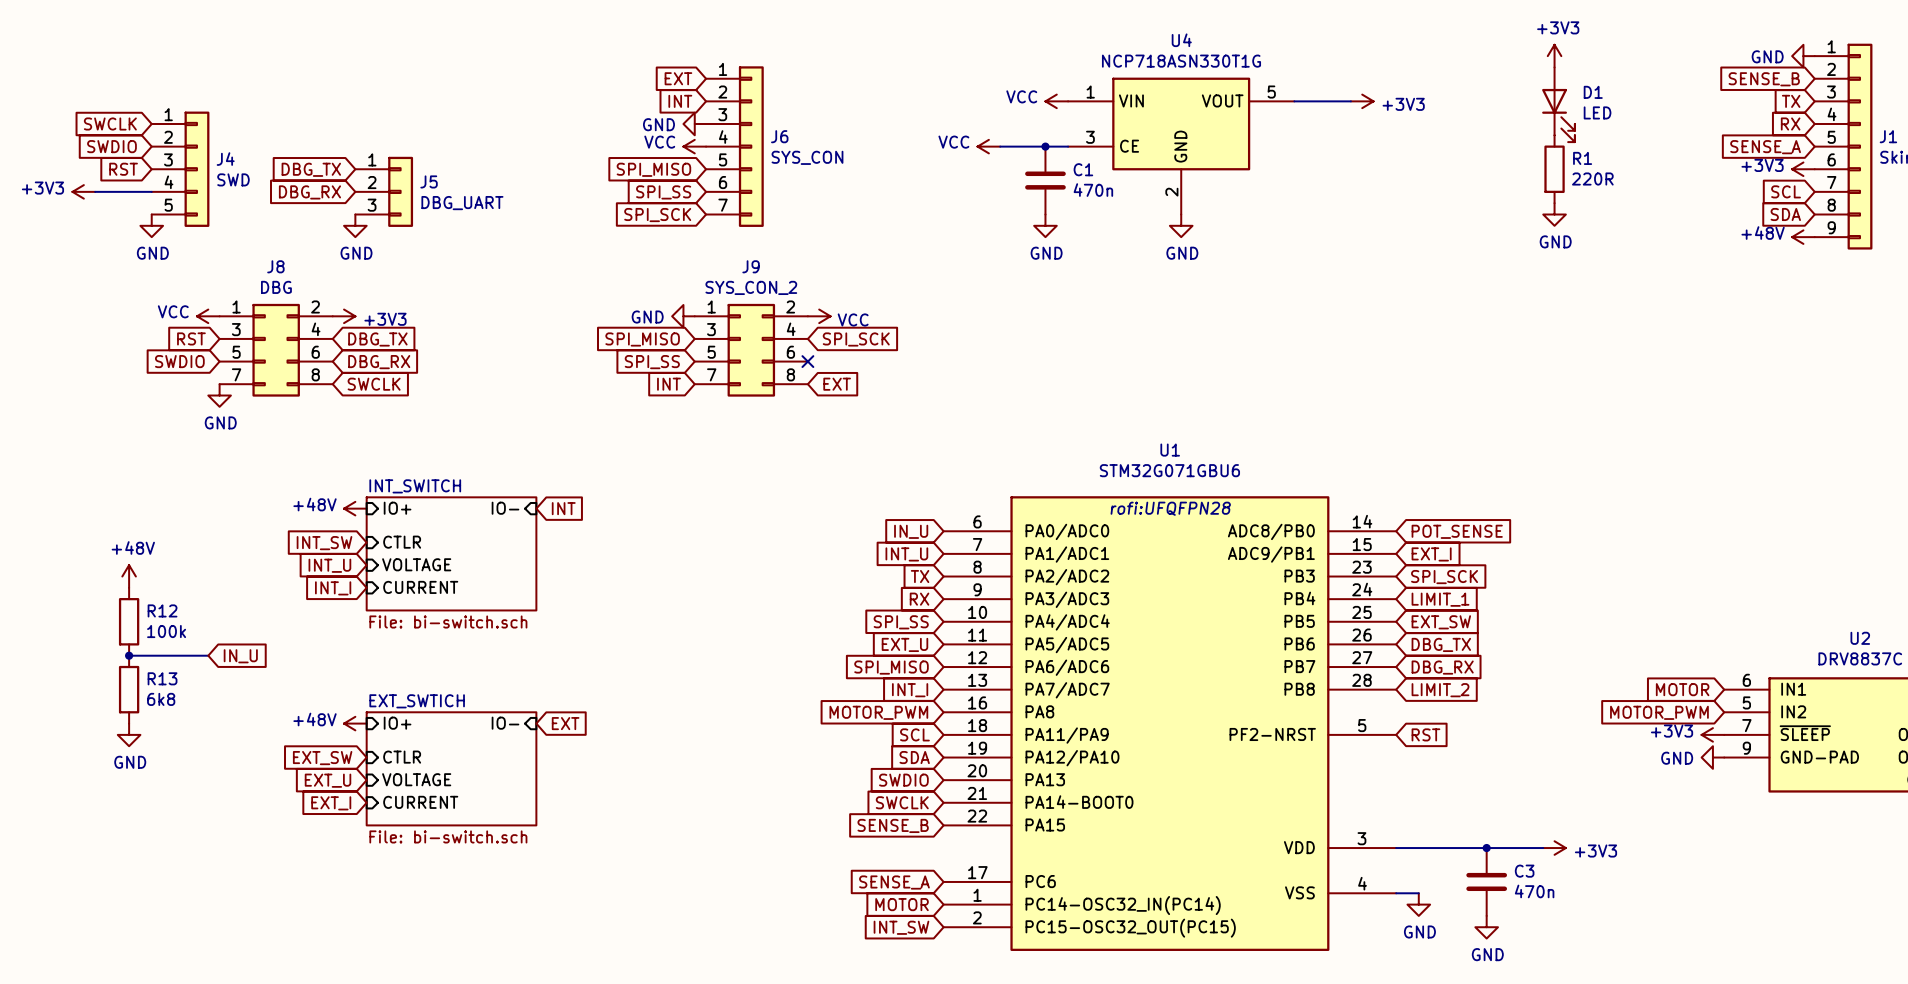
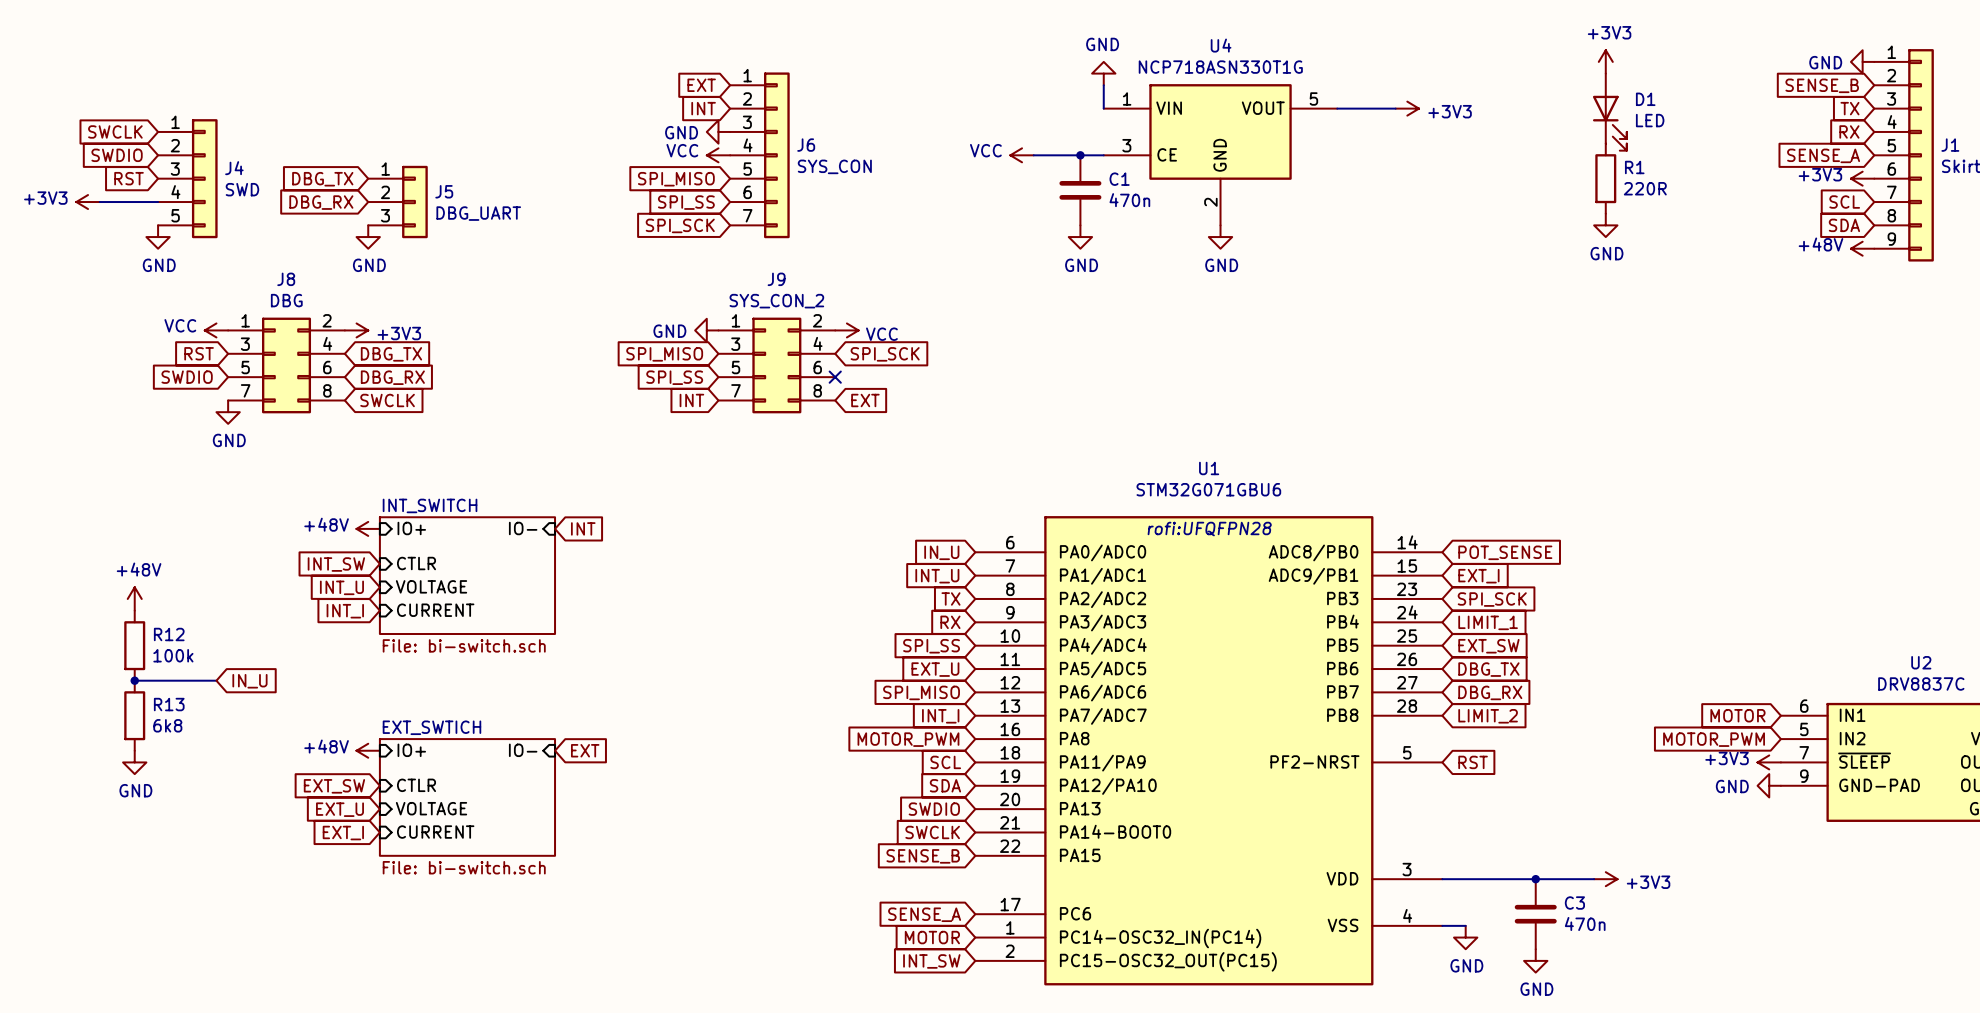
power symbol: none -> GND (1103, 73)
wire: none -> (1103, 85) (1103, 108)
power symbol: VCC (1056, 101) -> none

